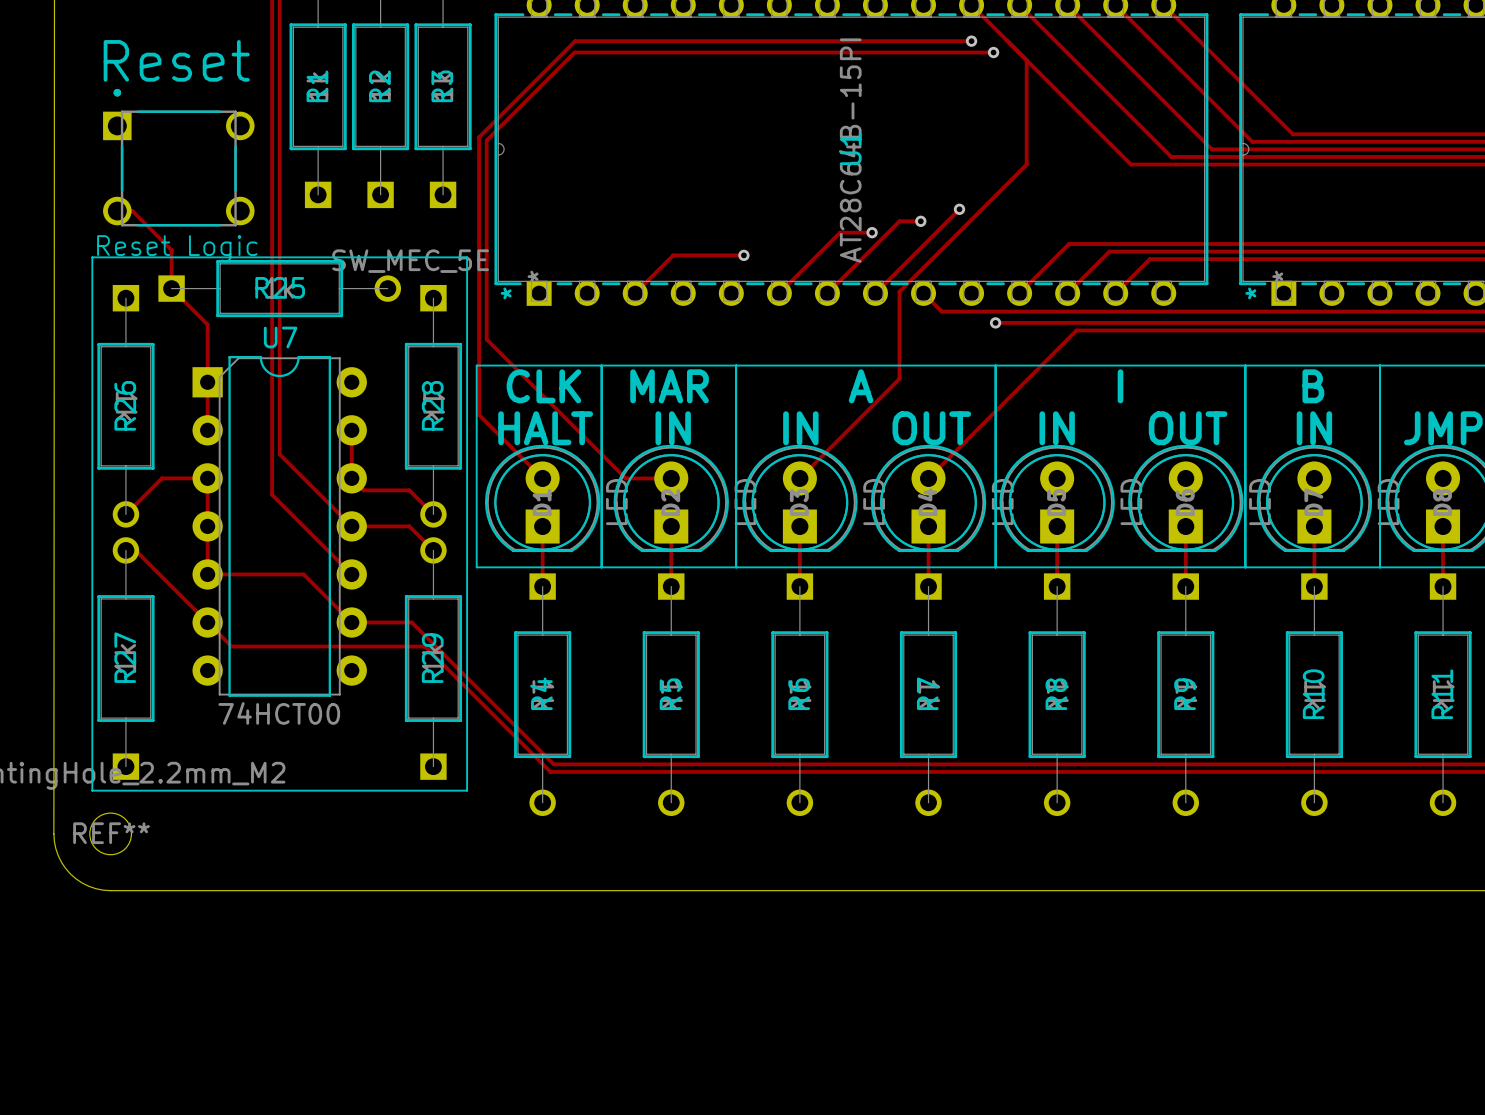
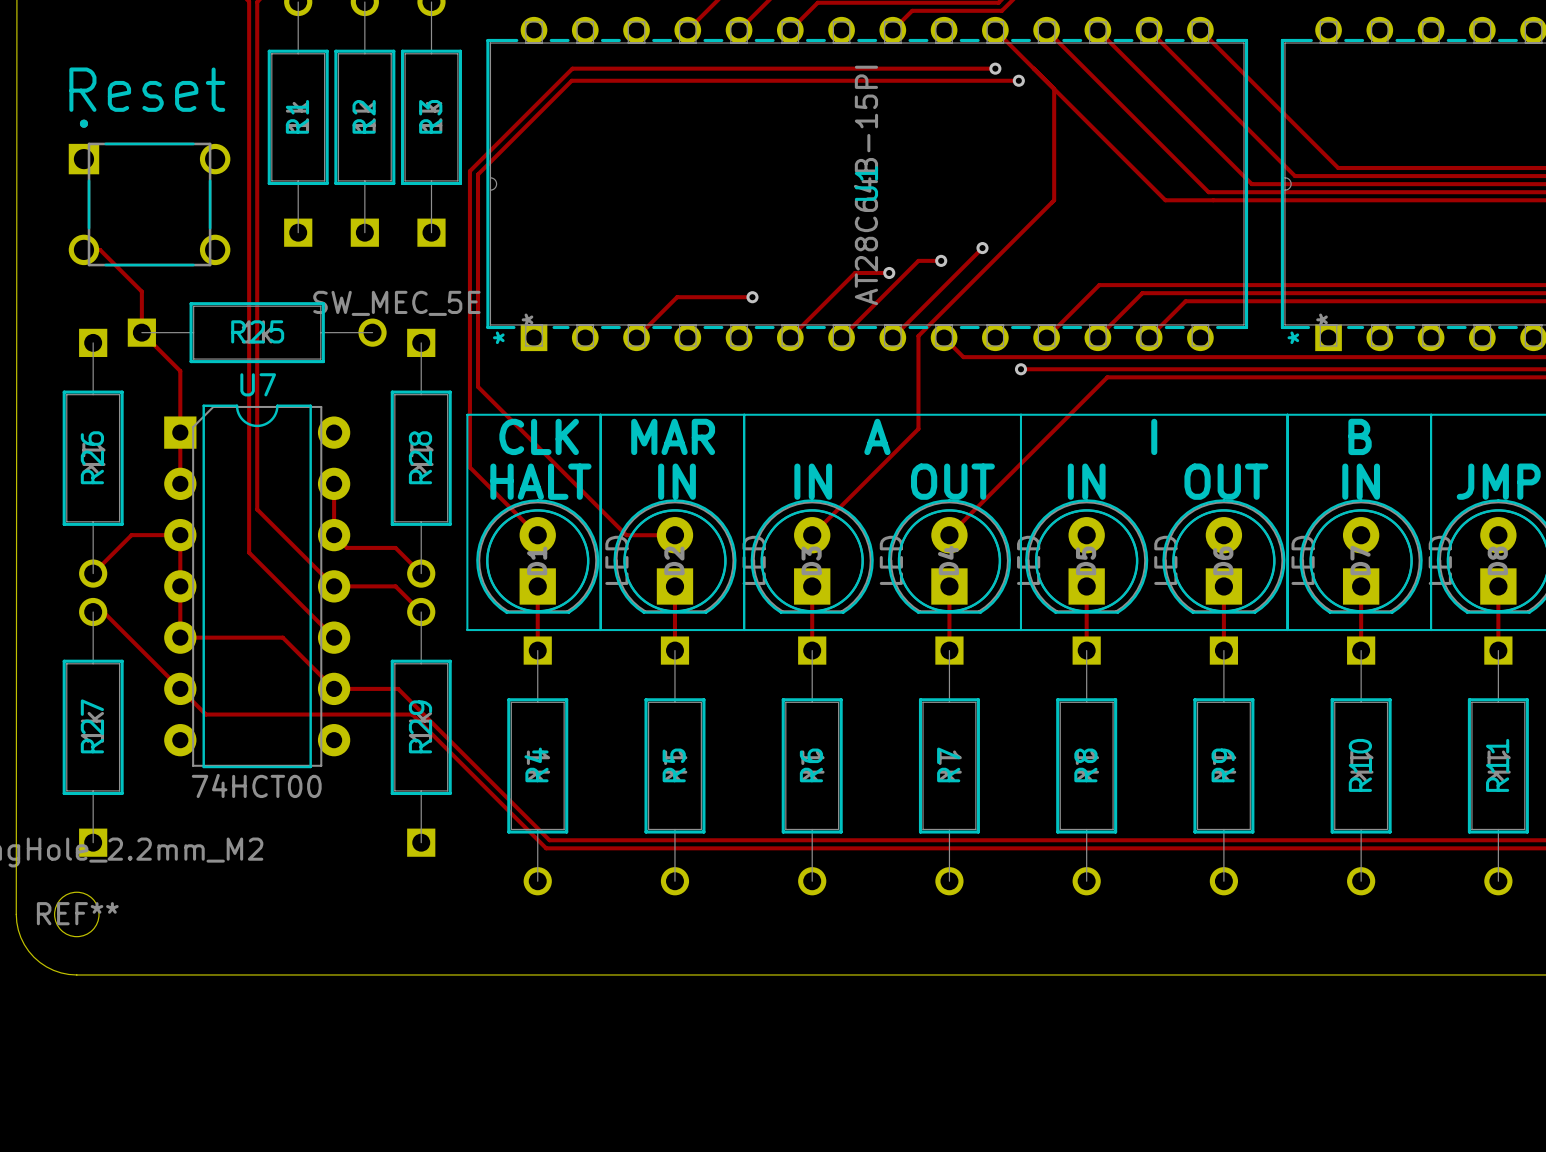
text: Reset Logic (177, 248) -> none
line: (92, 257) (467, 257) (467, 790) (92, 790) (92, 257) -> none

